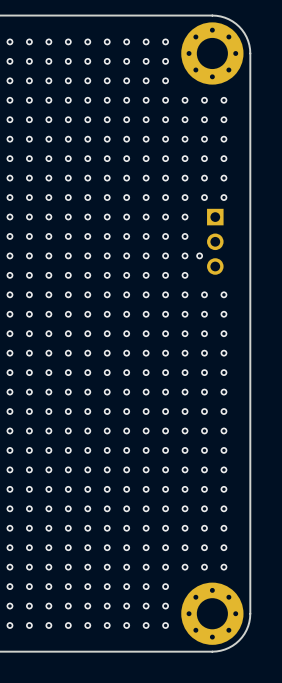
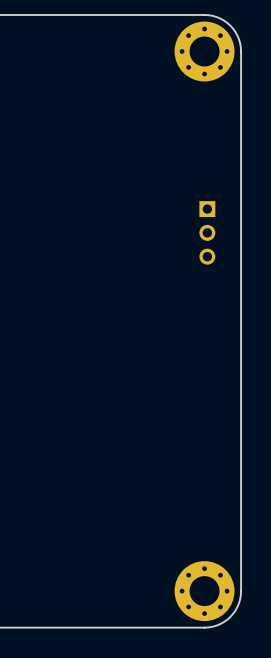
via: (9, 41) -> none
via: (29, 41) -> none
via: (48, 41) -> none
via: (68, 41) -> none
via: (87, 41) -> none
via: (107, 41) -> none
via: (126, 41) -> none
via: (146, 41) -> none
via: (165, 41) -> none
via: (9, 61) -> none
via: (29, 61) -> none
via: (48, 61) -> none
via: (68, 61) -> none
via: (87, 61) -> none
via: (107, 61) -> none
via: (126, 61) -> none
via: (146, 61) -> none
via: (165, 61) -> none
via: (9, 80) -> none
via: (29, 80) -> none
via: (48, 80) -> none
via: (68, 80) -> none
via: (87, 80) -> none
via: (107, 80) -> none
via: (126, 80) -> none
via: (146, 80) -> none
via: (165, 80) -> none
via: (9, 100) -> none
via: (29, 100) -> none
via: (48, 100) -> none
via: (68, 100) -> none
via: (87, 100) -> none
via: (107, 100) -> none
via: (126, 100) -> none
via: (146, 100) -> none
via: (165, 100) -> none
via: (185, 100) -> none
via: (204, 100) -> none
via: (223, 100) -> none
via: (9, 119) -> none
via: (29, 119) -> none
via: (48, 119) -> none
via: (68, 119) -> none
via: (87, 119) -> none
via: (107, 119) -> none
via: (126, 119) -> none
via: (146, 119) -> none
via: (165, 119) -> none
via: (185, 119) -> none
via: (204, 119) -> none
via: (223, 119) -> none
via: (9, 139) -> none
via: (29, 139) -> none
via: (48, 139) -> none
via: (68, 139) -> none
via: (87, 139) -> none
via: (107, 139) -> none
via: (126, 139) -> none
via: (146, 139) -> none
via: (165, 139) -> none
via: (185, 139) -> none
via: (204, 139) -> none
via: (223, 139) -> none
via: (9, 158) -> none
via: (29, 158) -> none
via: (48, 158) -> none
via: (68, 158) -> none
via: (87, 158) -> none
via: (107, 158) -> none
via: (126, 158) -> none
via: (146, 158) -> none
via: (165, 158) -> none
via: (185, 158) -> none
via: (204, 158) -> none
via: (223, 158) -> none
via: (9, 178) -> none
via: (29, 178) -> none
via: (48, 178) -> none
via: (68, 178) -> none
via: (87, 178) -> none
via: (107, 178) -> none
via: (126, 178) -> none
via: (146, 178) -> none
via: (165, 178) -> none
via: (185, 178) -> none
via: (204, 178) -> none
via: (223, 178) -> none
via: (9, 197) -> none
via: (29, 197) -> none
via: (48, 197) -> none
via: (68, 197) -> none
via: (87, 197) -> none
via: (107, 197) -> none
via: (126, 197) -> none
via: (146, 197) -> none
via: (165, 197) -> none
via: (185, 197) -> none
via: (204, 197) -> none
via: (223, 197) -> none
via: (9, 216) -> none
via: (29, 216) -> none
via: (48, 216) -> none
via: (68, 216) -> none
via: (87, 216) -> none
via: (107, 216) -> none
via: (126, 216) -> none
via: (146, 216) -> none
via: (165, 216) -> none
via: (185, 216) -> none
via: (9, 236) -> none
via: (29, 236) -> none
via: (48, 236) -> none
via: (68, 236) -> none
via: (87, 236) -> none
via: (107, 236) -> none
via: (126, 236) -> none
via: (146, 236) -> none
via: (165, 236) -> none
via: (185, 236) -> none
via: (9, 255) -> none
via: (29, 255) -> none
via: (48, 255) -> none
via: (68, 255) -> none
via: (87, 255) -> none
via: (107, 255) -> none
via: (126, 255) -> none
via: (146, 255) -> none
via: (165, 255) -> none
via: (185, 255) -> none
via: (199, 255) -> none
via: (9, 275) -> none
via: (29, 275) -> none
via: (48, 275) -> none
via: (68, 275) -> none
via: (87, 275) -> none
via: (107, 275) -> none
via: (126, 275) -> none
via: (146, 275) -> none
via: (165, 275) -> none
via: (185, 275) -> none
via: (9, 294) -> none
via: (29, 294) -> none
via: (48, 294) -> none
via: (68, 294) -> none
via: (87, 294) -> none
via: (107, 294) -> none
via: (126, 294) -> none
via: (146, 294) -> none
via: (165, 294) -> none
via: (185, 294) -> none
via: (204, 294) -> none
via: (223, 294) -> none
via: (9, 314) -> none
via: (29, 314) -> none
via: (48, 314) -> none
via: (68, 314) -> none
via: (87, 314) -> none
via: (107, 314) -> none
via: (126, 314) -> none
via: (146, 314) -> none
via: (165, 314) -> none
via: (185, 314) -> none
via: (204, 314) -> none
via: (223, 314) -> none
via: (9, 333) -> none
via: (29, 333) -> none
via: (48, 333) -> none
via: (68, 333) -> none
via: (87, 333) -> none
via: (107, 333) -> none
via: (126, 333) -> none
via: (146, 333) -> none
via: (165, 333) -> none
via: (185, 333) -> none
via: (204, 333) -> none
via: (223, 333) -> none
via: (9, 353) -> none
via: (29, 353) -> none
via: (48, 353) -> none
via: (68, 353) -> none
via: (87, 353) -> none
via: (107, 353) -> none
via: (126, 353) -> none
via: (146, 353) -> none
via: (165, 353) -> none
via: (185, 353) -> none
via: (204, 353) -> none
via: (223, 353) -> none
via: (9, 372) -> none
via: (29, 372) -> none
via: (48, 372) -> none
via: (68, 372) -> none
via: (87, 372) -> none
via: (107, 372) -> none
via: (126, 372) -> none
via: (146, 372) -> none
via: (165, 372) -> none
via: (185, 372) -> none
via: (204, 372) -> none
via: (223, 372) -> none
via: (9, 392) -> none
via: (29, 392) -> none
via: (48, 392) -> none
via: (68, 392) -> none
via: (87, 392) -> none
via: (107, 392) -> none
via: (126, 392) -> none
via: (146, 392) -> none
via: (165, 392) -> none
via: (185, 392) -> none
via: (204, 392) -> none
via: (223, 392) -> none
via: (9, 411) -> none
via: (29, 411) -> none
via: (48, 411) -> none
via: (68, 411) -> none
via: (87, 411) -> none
via: (107, 411) -> none
via: (126, 411) -> none
via: (146, 411) -> none
via: (165, 411) -> none
via: (185, 411) -> none
via: (204, 411) -> none
via: (223, 411) -> none
via: (9, 430) -> none
via: (29, 430) -> none
via: (48, 430) -> none
via: (68, 430) -> none
via: (87, 430) -> none
via: (107, 430) -> none
via: (126, 430) -> none
via: (146, 430) -> none
via: (165, 430) -> none
via: (185, 430) -> none
via: (204, 430) -> none
via: (223, 430) -> none
via: (9, 450) -> none
via: (29, 450) -> none
via: (48, 450) -> none
via: (68, 450) -> none
via: (87, 450) -> none
via: (107, 450) -> none
via: (126, 450) -> none
via: (146, 450) -> none
via: (165, 450) -> none
via: (185, 450) -> none
via: (204, 450) -> none
via: (223, 450) -> none
via: (9, 469) -> none
via: (29, 469) -> none
via: (48, 469) -> none
via: (68, 469) -> none
via: (87, 469) -> none
via: (107, 469) -> none
via: (126, 469) -> none
via: (146, 469) -> none
via: (165, 469) -> none
via: (185, 469) -> none
via: (204, 469) -> none
via: (223, 469) -> none
via: (9, 489) -> none
via: (29, 489) -> none
via: (48, 489) -> none
via: (68, 489) -> none
via: (87, 489) -> none
via: (107, 489) -> none
via: (126, 489) -> none
via: (146, 489) -> none
via: (165, 489) -> none
via: (185, 489) -> none
via: (204, 489) -> none
via: (223, 489) -> none
via: (9, 508) -> none
via: (29, 508) -> none
via: (48, 508) -> none
via: (68, 508) -> none
via: (87, 508) -> none
via: (107, 508) -> none
via: (126, 508) -> none
via: (146, 508) -> none
via: (165, 508) -> none
via: (185, 508) -> none
via: (204, 508) -> none
via: (223, 508) -> none
via: (9, 528) -> none
via: (29, 528) -> none
via: (48, 528) -> none
via: (68, 528) -> none
via: (87, 528) -> none
via: (107, 528) -> none
via: (126, 528) -> none
via: (146, 528) -> none
via: (165, 528) -> none
via: (185, 528) -> none
via: (204, 528) -> none
via: (223, 528) -> none
via: (9, 547) -> none
via: (29, 547) -> none
via: (48, 547) -> none
via: (68, 547) -> none
via: (87, 547) -> none
via: (107, 547) -> none
via: (126, 547) -> none
via: (146, 547) -> none
via: (165, 547) -> none
via: (185, 547) -> none
via: (204, 547) -> none
via: (223, 547) -> none
via: (9, 567) -> none
via: (29, 567) -> none
via: (48, 567) -> none
via: (68, 567) -> none
via: (87, 567) -> none
via: (107, 567) -> none
via: (126, 567) -> none
via: (146, 567) -> none
via: (165, 567) -> none
via: (185, 567) -> none
via: (204, 567) -> none
via: (223, 567) -> none
via: (9, 586) -> none
via: (29, 586) -> none
via: (48, 586) -> none
via: (68, 586) -> none
via: (87, 586) -> none
via: (107, 586) -> none
via: (126, 586) -> none
via: (146, 586) -> none
via: (165, 586) -> none
via: (9, 606) -> none
via: (29, 606) -> none
via: (48, 606) -> none
via: (68, 606) -> none
via: (87, 606) -> none
via: (107, 606) -> none
via: (126, 606) -> none
via: (146, 606) -> none
via: (165, 606) -> none
via: (9, 625) -> none
via: (29, 625) -> none
via: (48, 625) -> none
via: (68, 625) -> none
via: (87, 625) -> none
via: (107, 625) -> none
via: (126, 625) -> none
via: (146, 625) -> none
via: (165, 625) -> none

